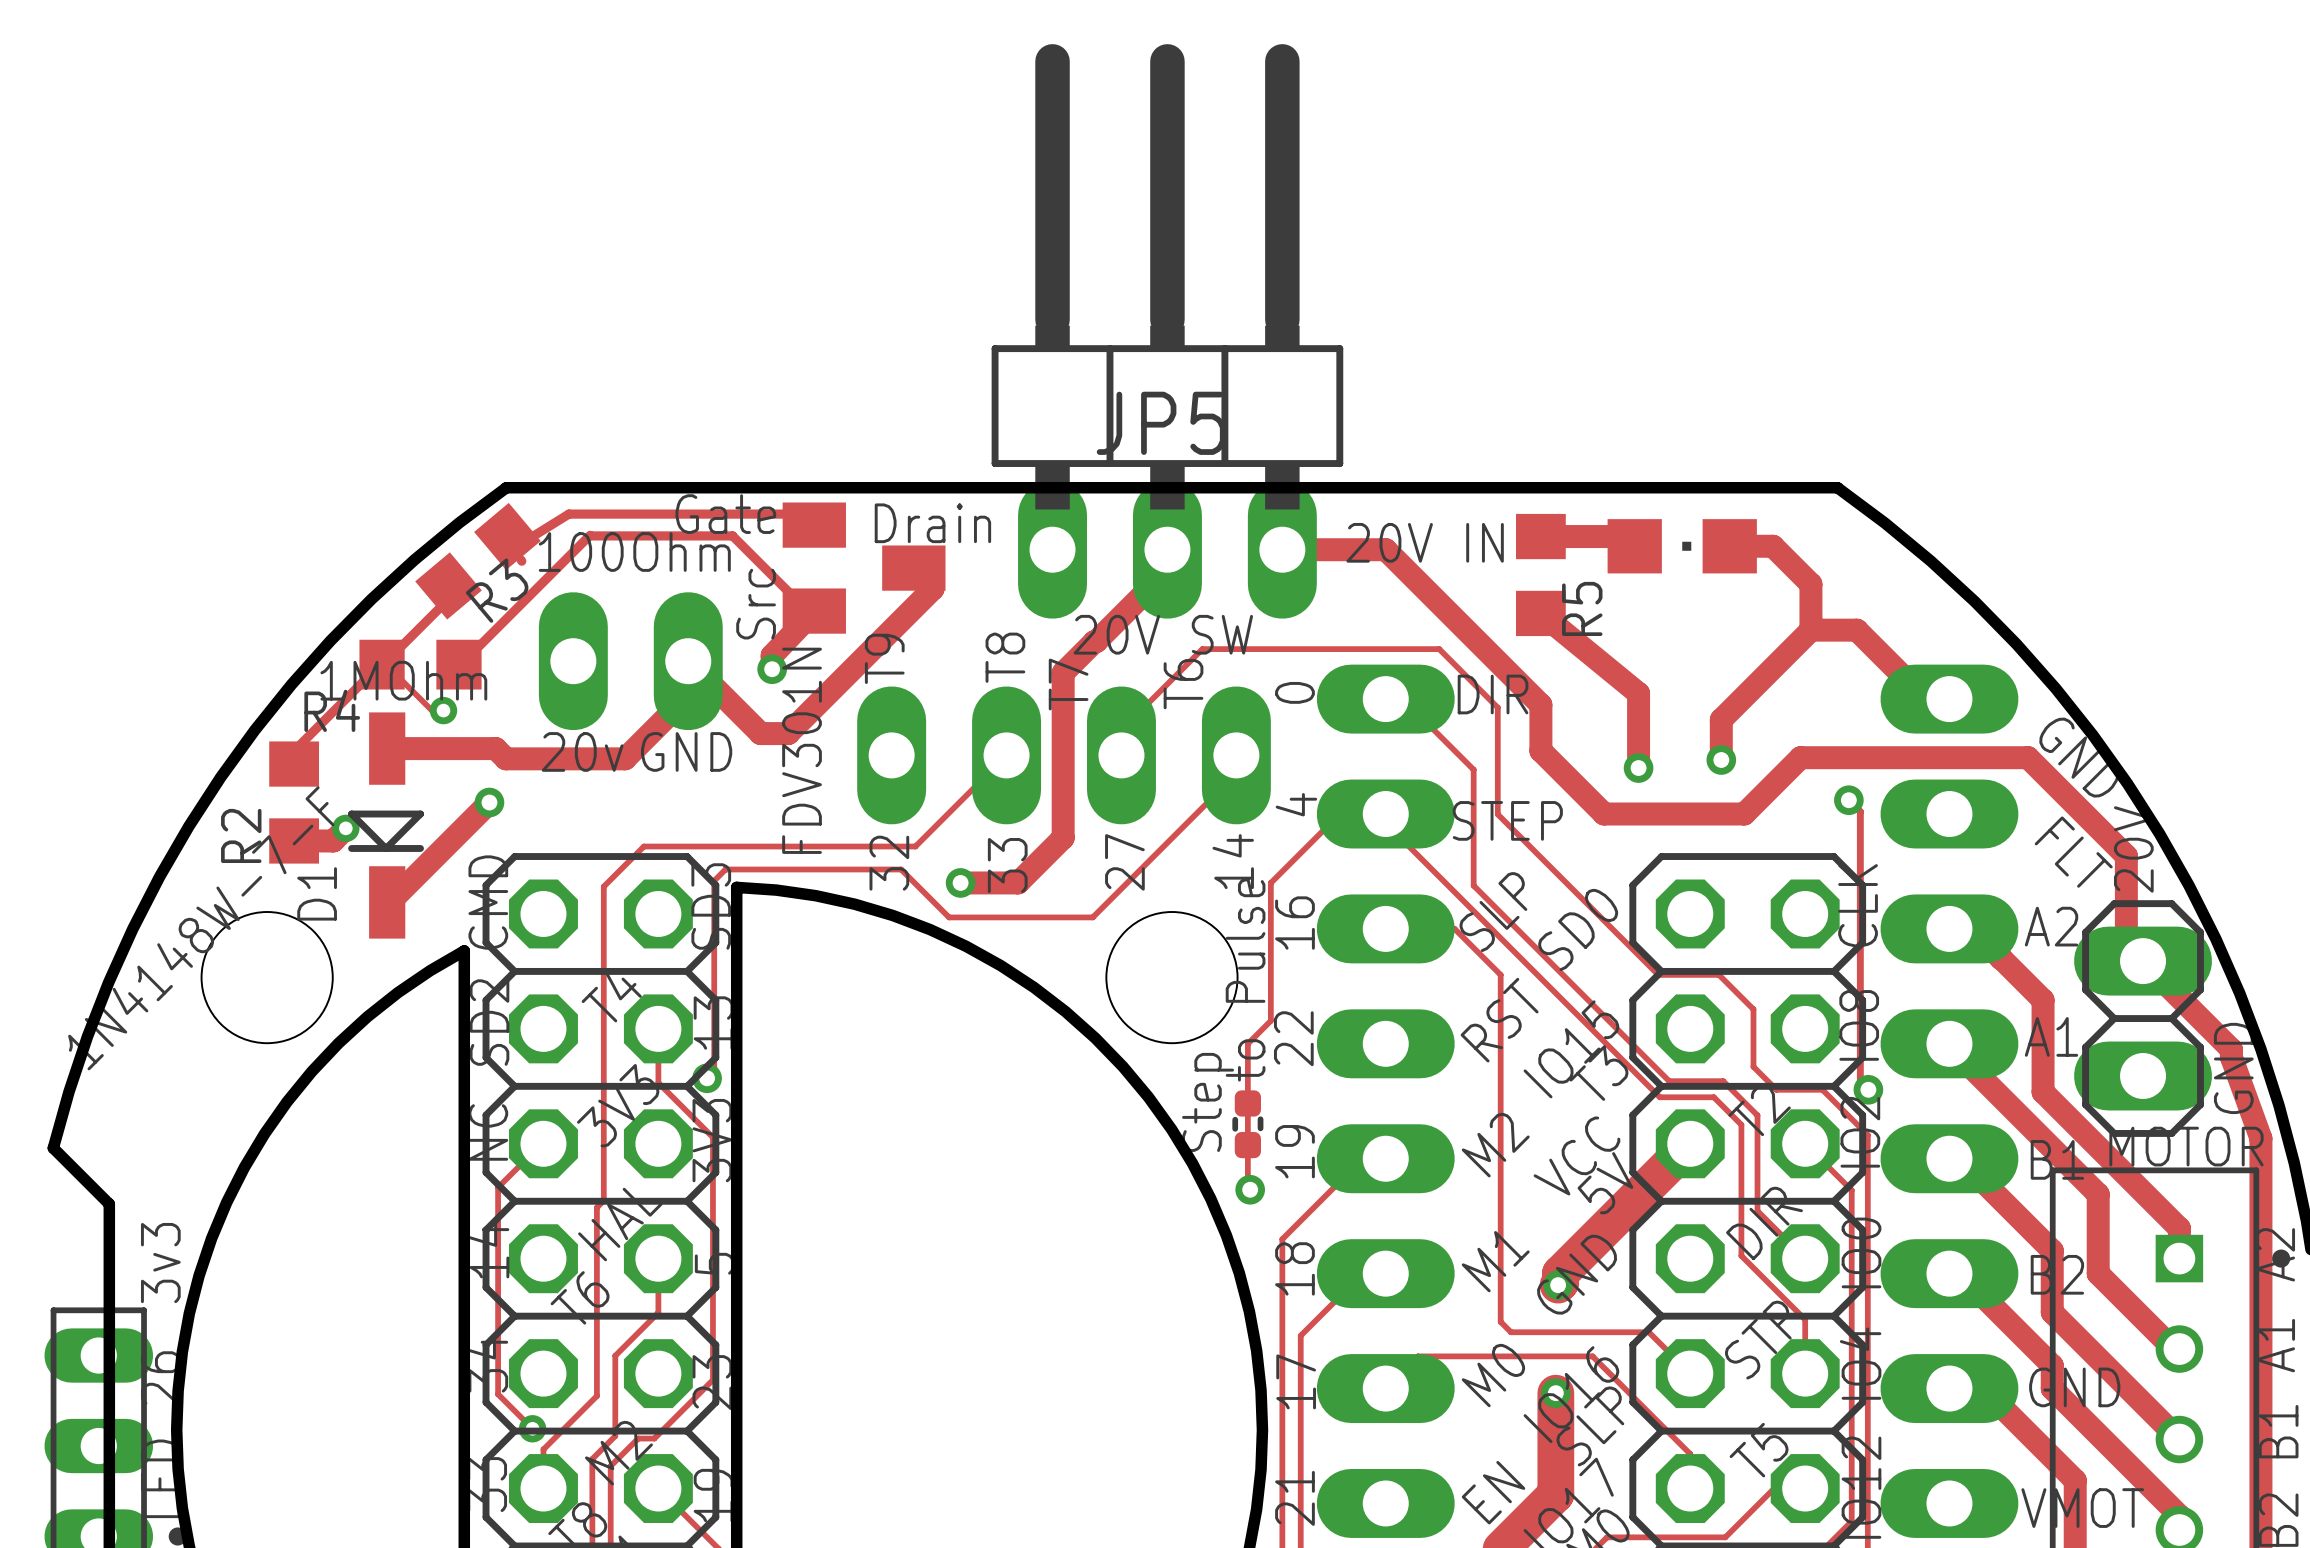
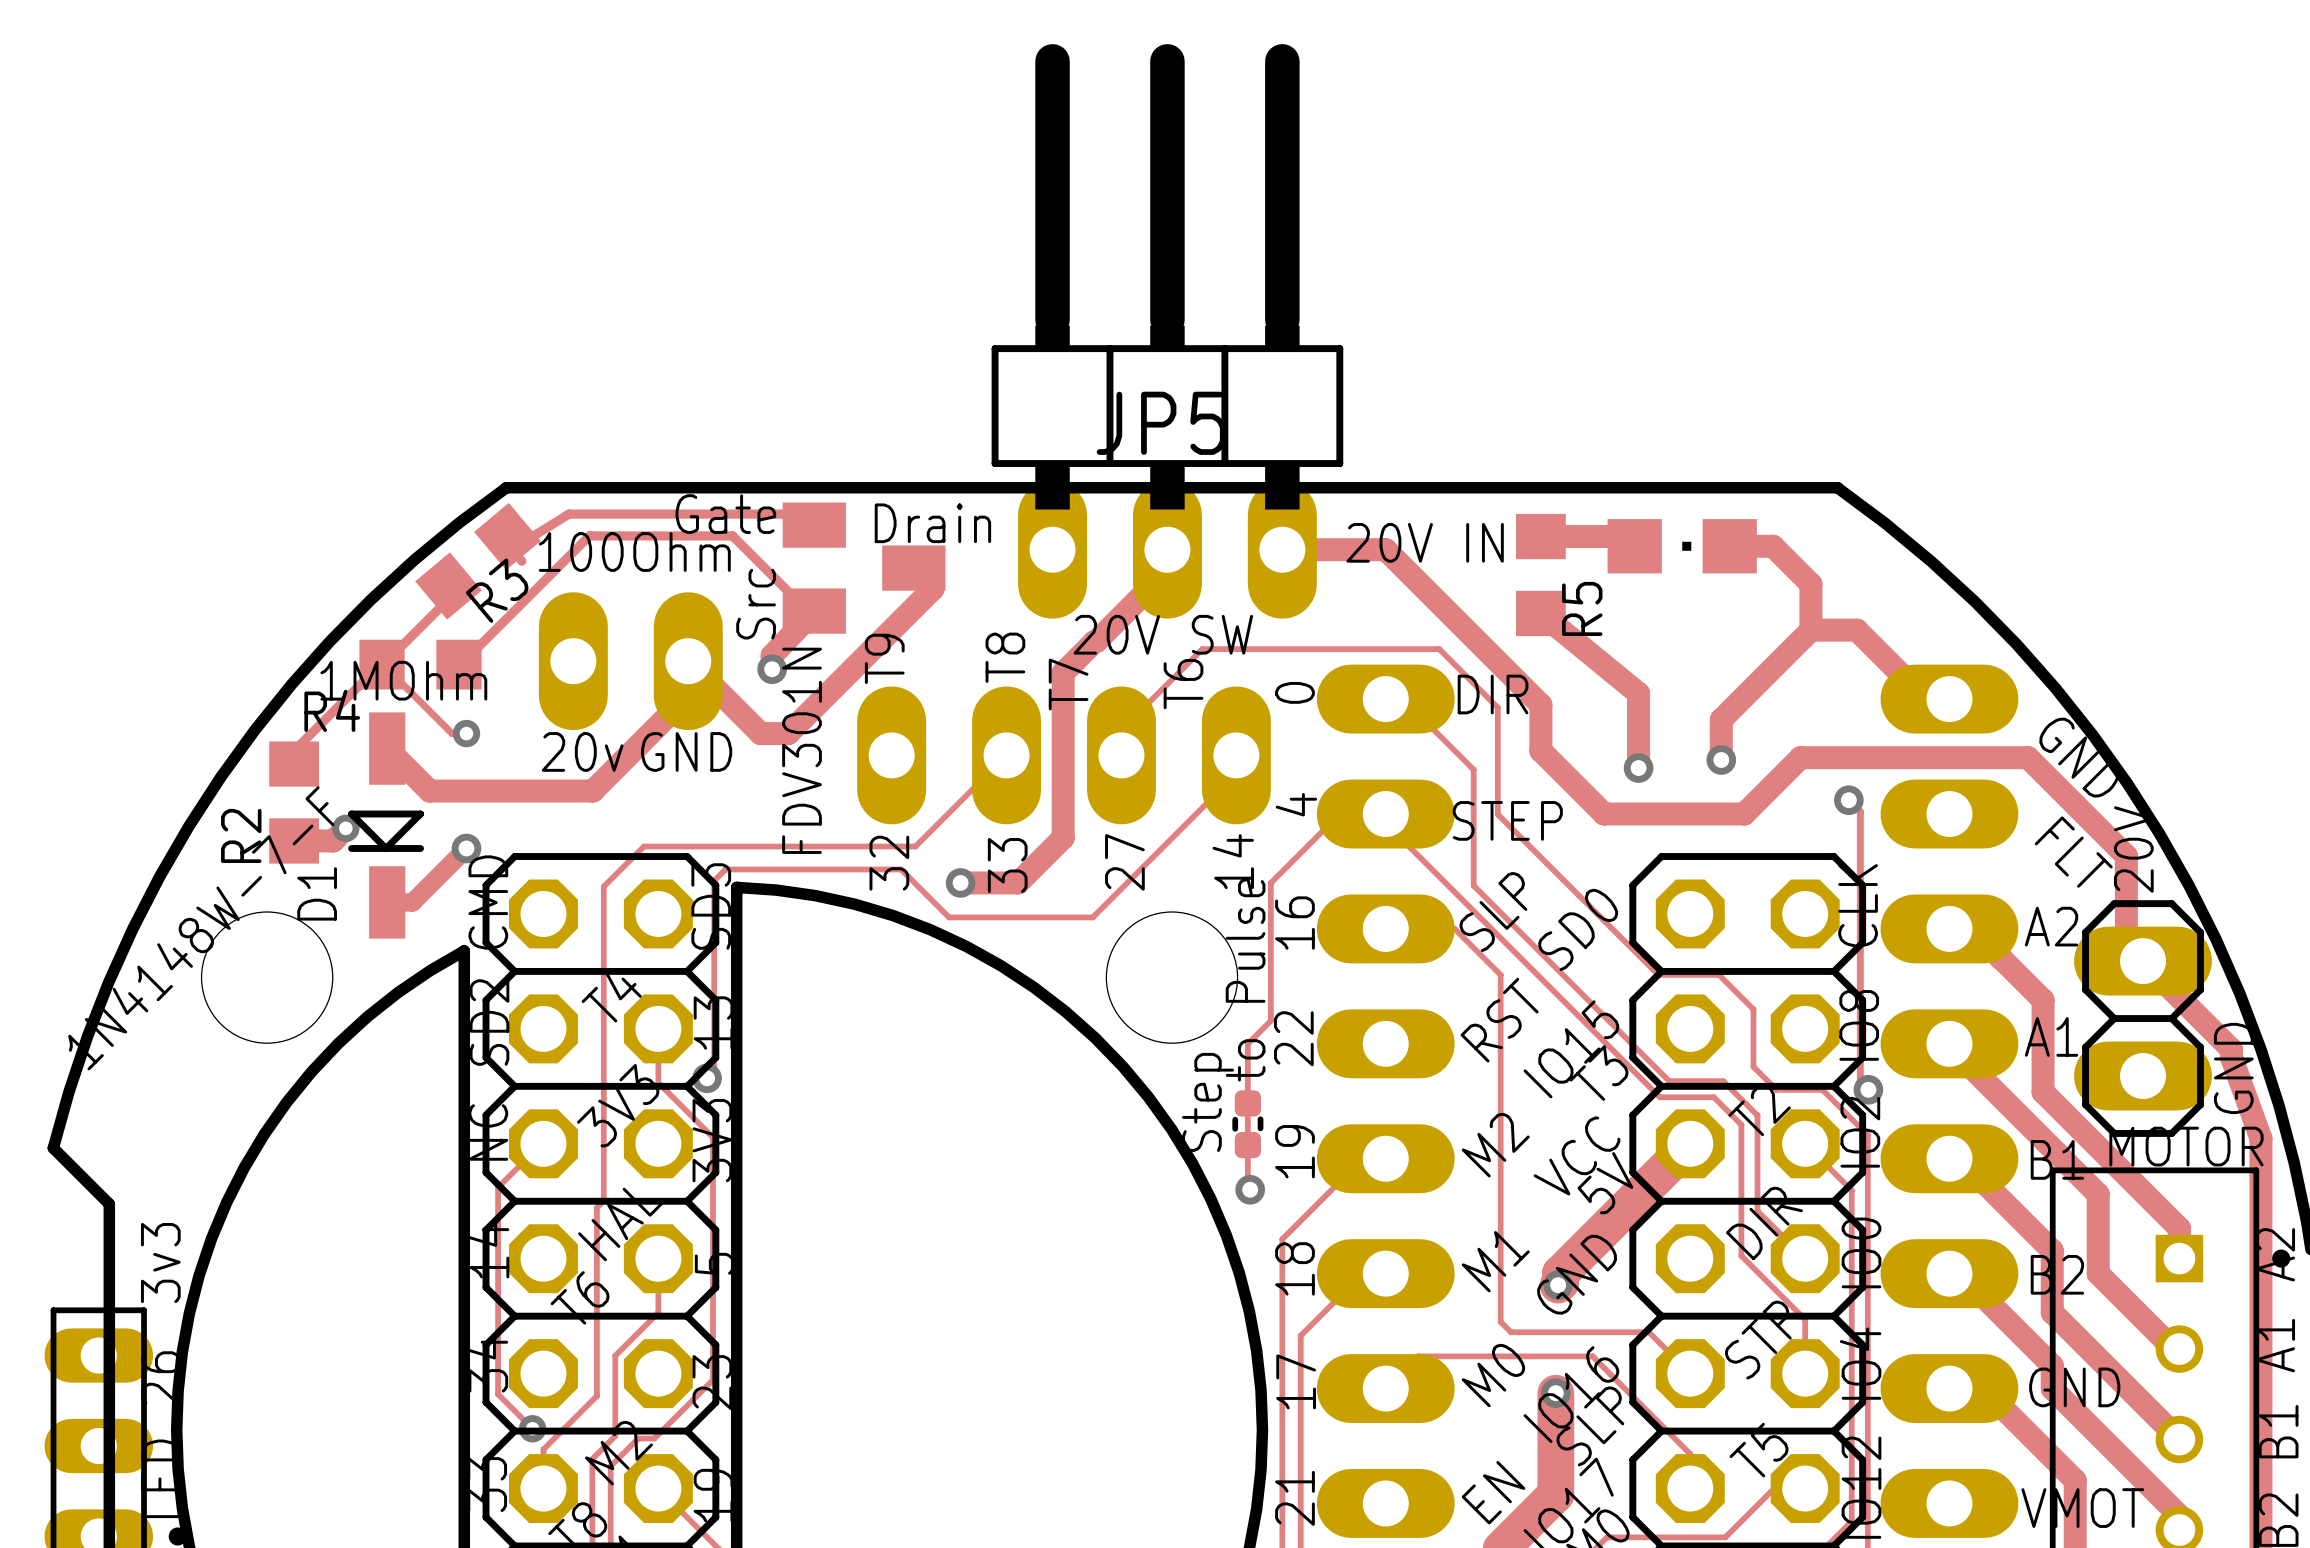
track: (384, 663) (432, 710) (443, 710) -> none
track: none -> (383, 664) (452, 733) (466, 733) (454, 733)
via position: (443, 710) -> (466, 733)
track: (387, 748) (495, 748) (505, 758) (625, 758) -> (387, 748) (429, 791) (592, 791) (625, 758)
track: (489, 802) (389, 902) -> none
via position: (489, 802) -> (466, 848)
track: none -> (466, 848) (412, 902) (387, 902)

